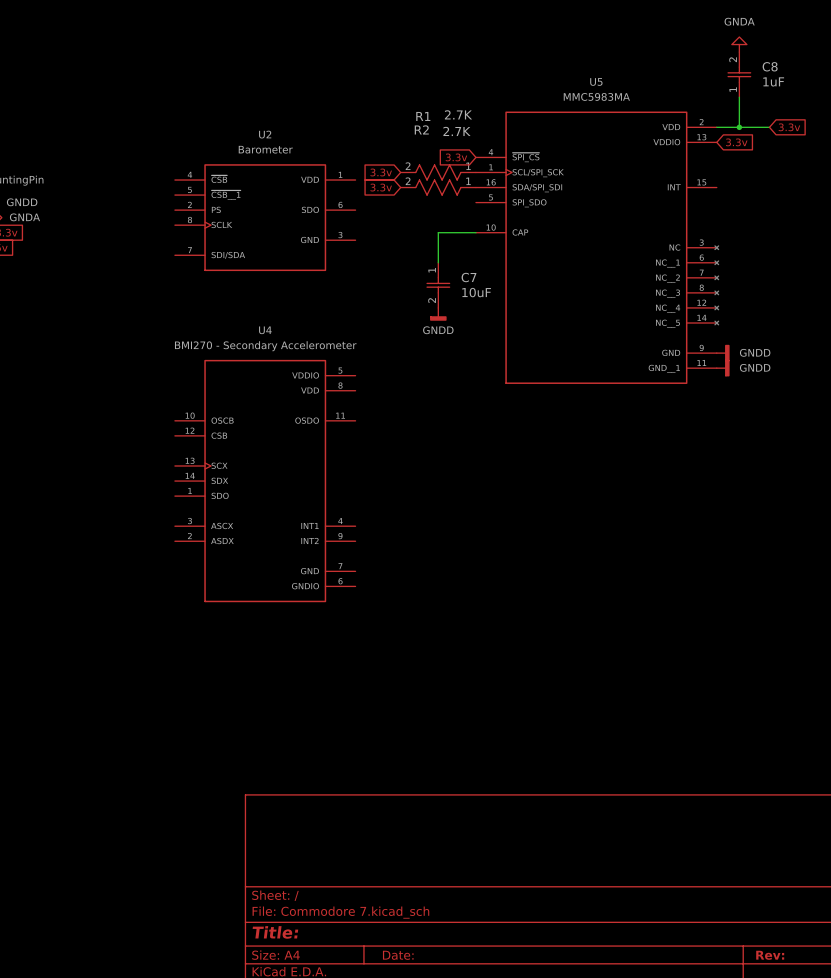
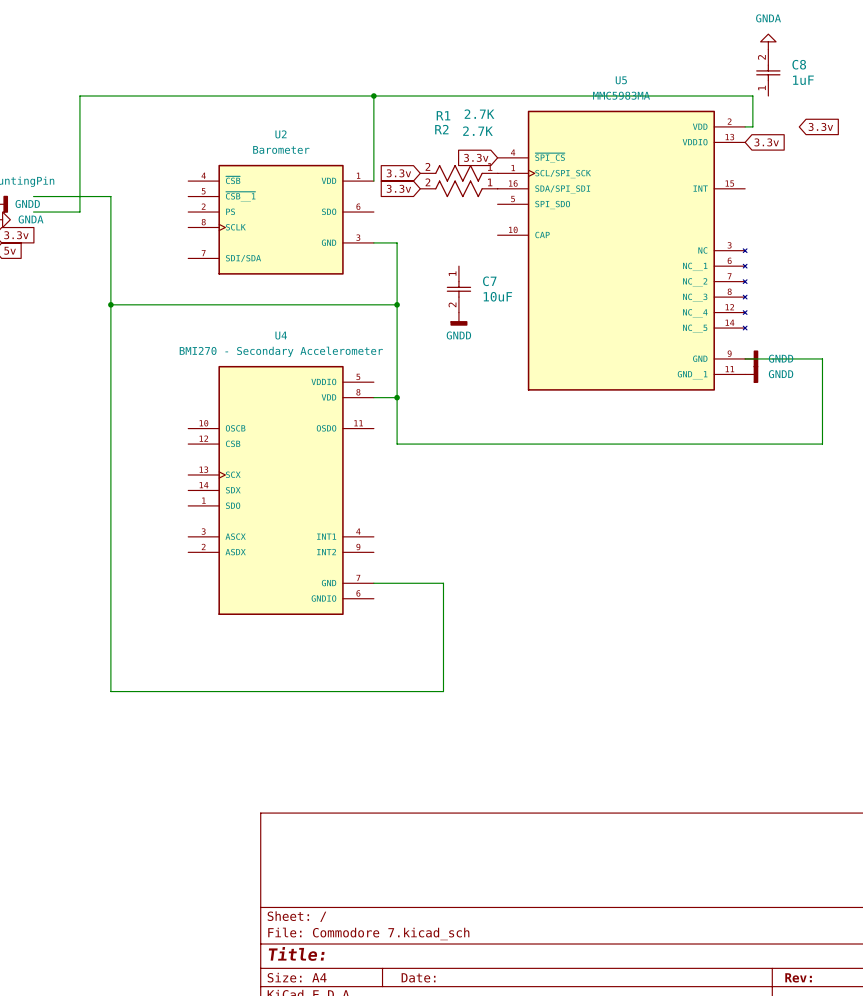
wire: none -> (373, 96) (373, 181)
junction: none -> (373, 96)
wire: (739, 97) (739, 127) -> none
wire: (724, 127) (769, 127) -> (752, 126) (752, 96) (79, 96) (79, 212) (33, 212)
junction: (739, 127) -> none
wire: none -> (33, 196) (110, 196) (110, 691) (443, 691) (443, 583) (373, 583)
wire: (475, 232) (438, 232) (438, 262) -> none
wire: none -> (373, 242) (397, 242) (397, 444) (822, 444) (822, 358) (745, 358)
wire: none -> (110, 304) (397, 304)
junction: none -> (110, 304)
junction: none -> (397, 304)
wire: none -> (373, 397) (397, 397)
junction: none -> (397, 397)

